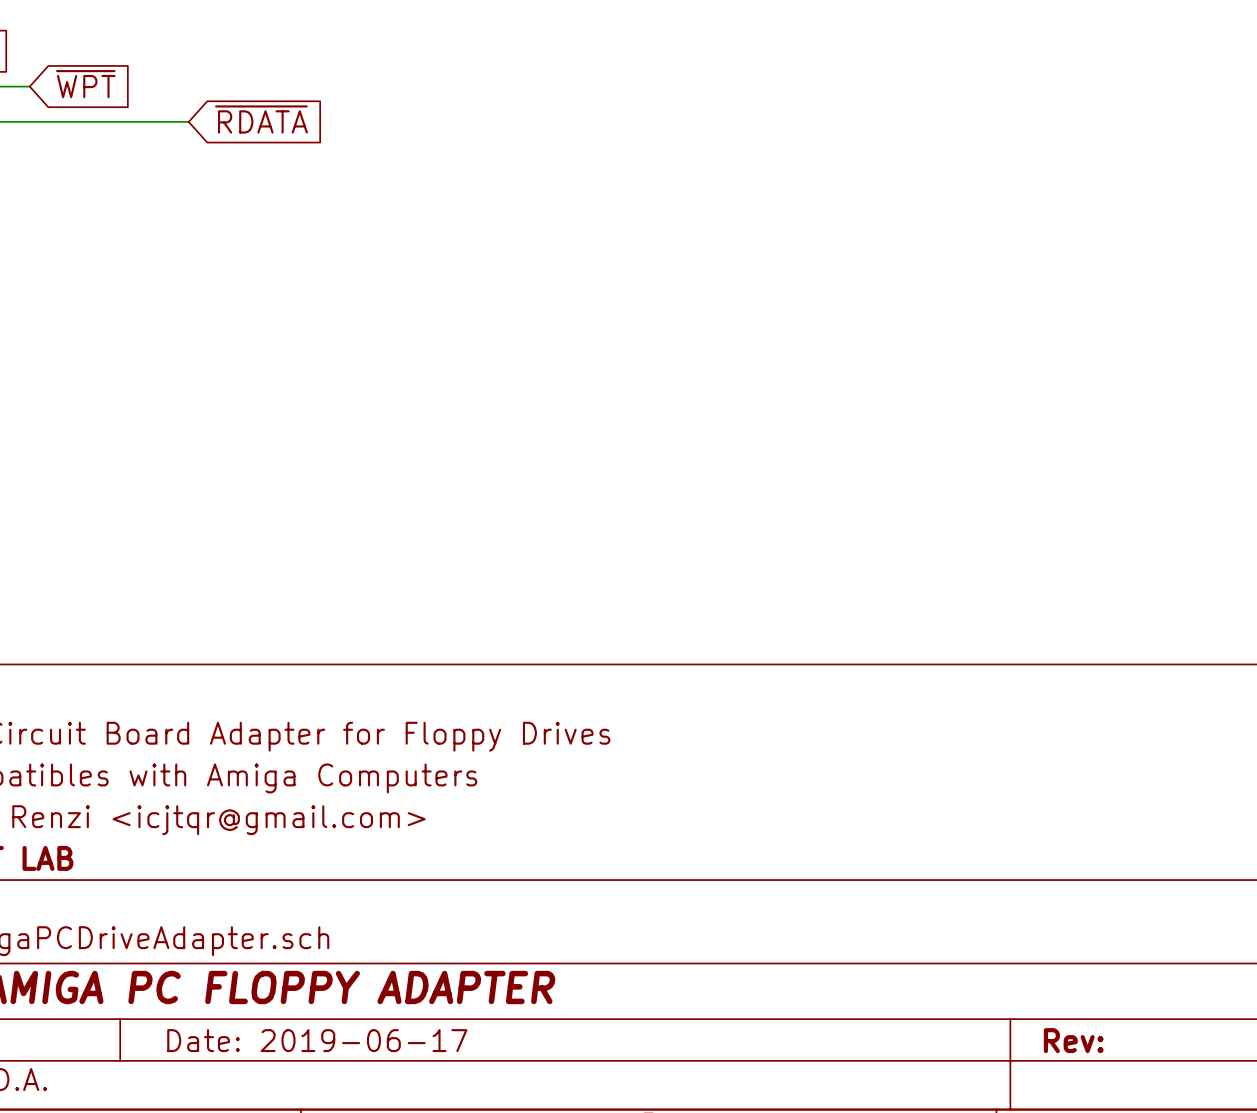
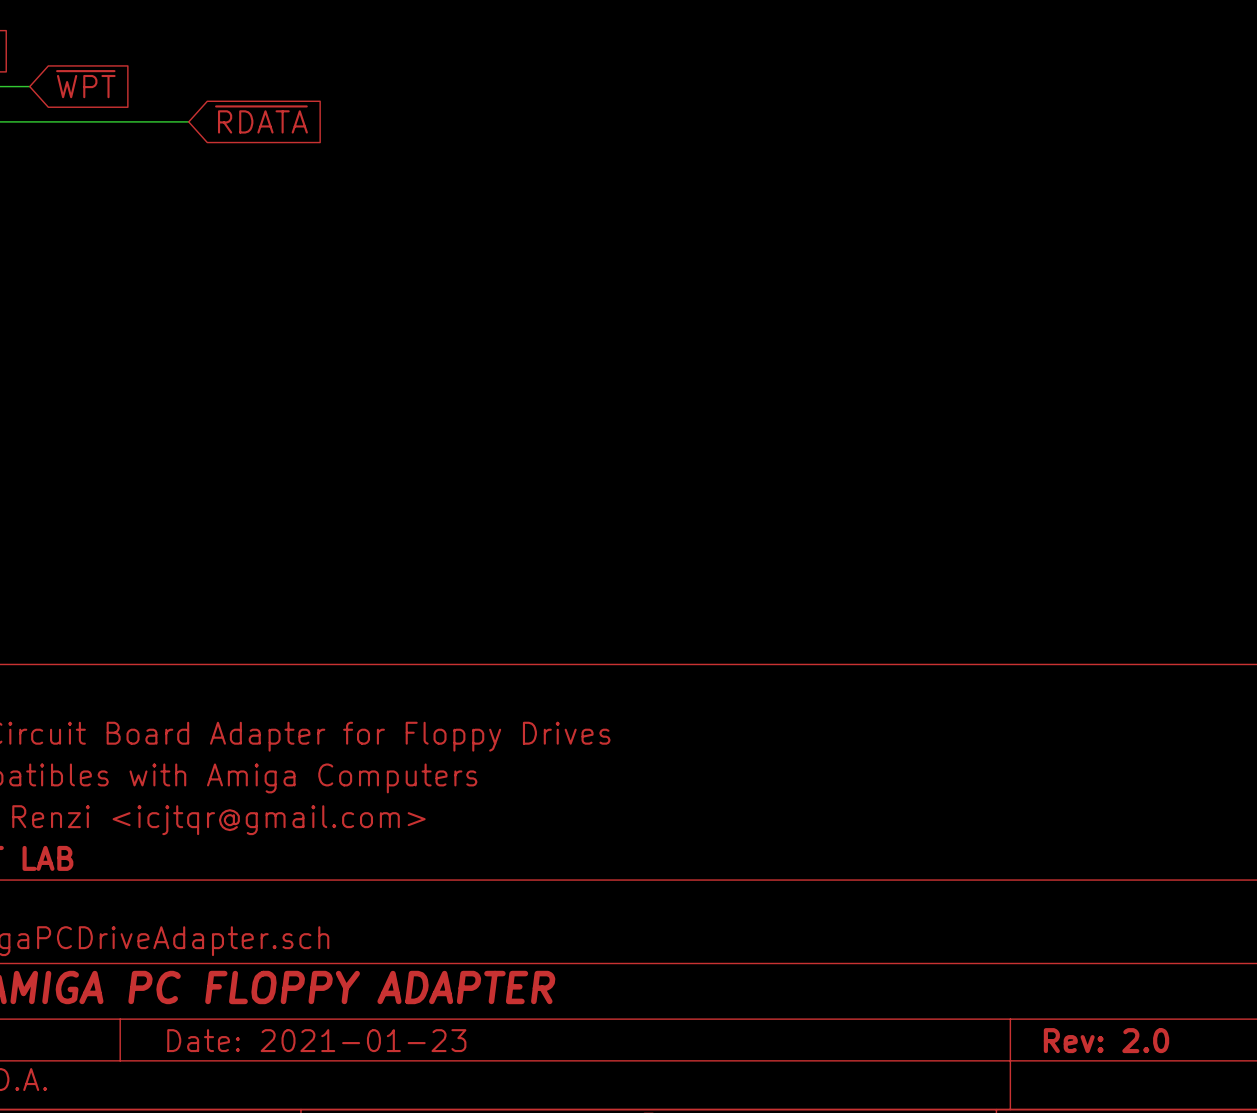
title block: Date: 2019-06-17 (317, 1040) -> Date: 2021-01-23 (316, 1040)
title block: Rev: (1073, 1040) -> Rev: 2.0 (1106, 1040)

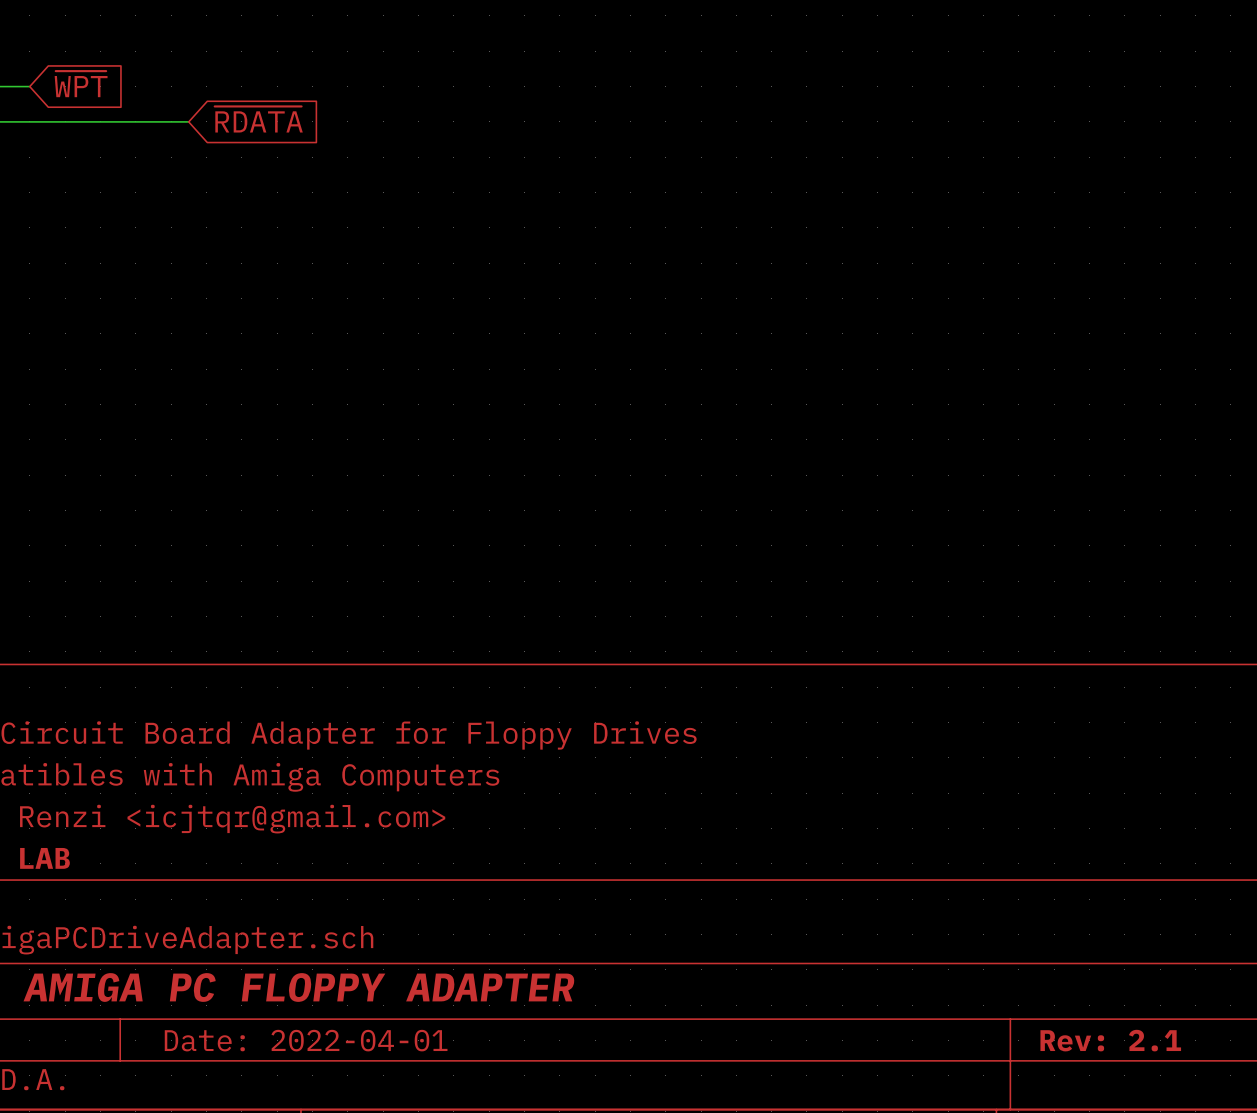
title block: Date: 2021-01-23 (316, 1040) -> Date: 2022-04-01 (306, 1040)
title block: Rev: 2.0 (1106, 1040) -> Rev: 2.1 (1110, 1040)

